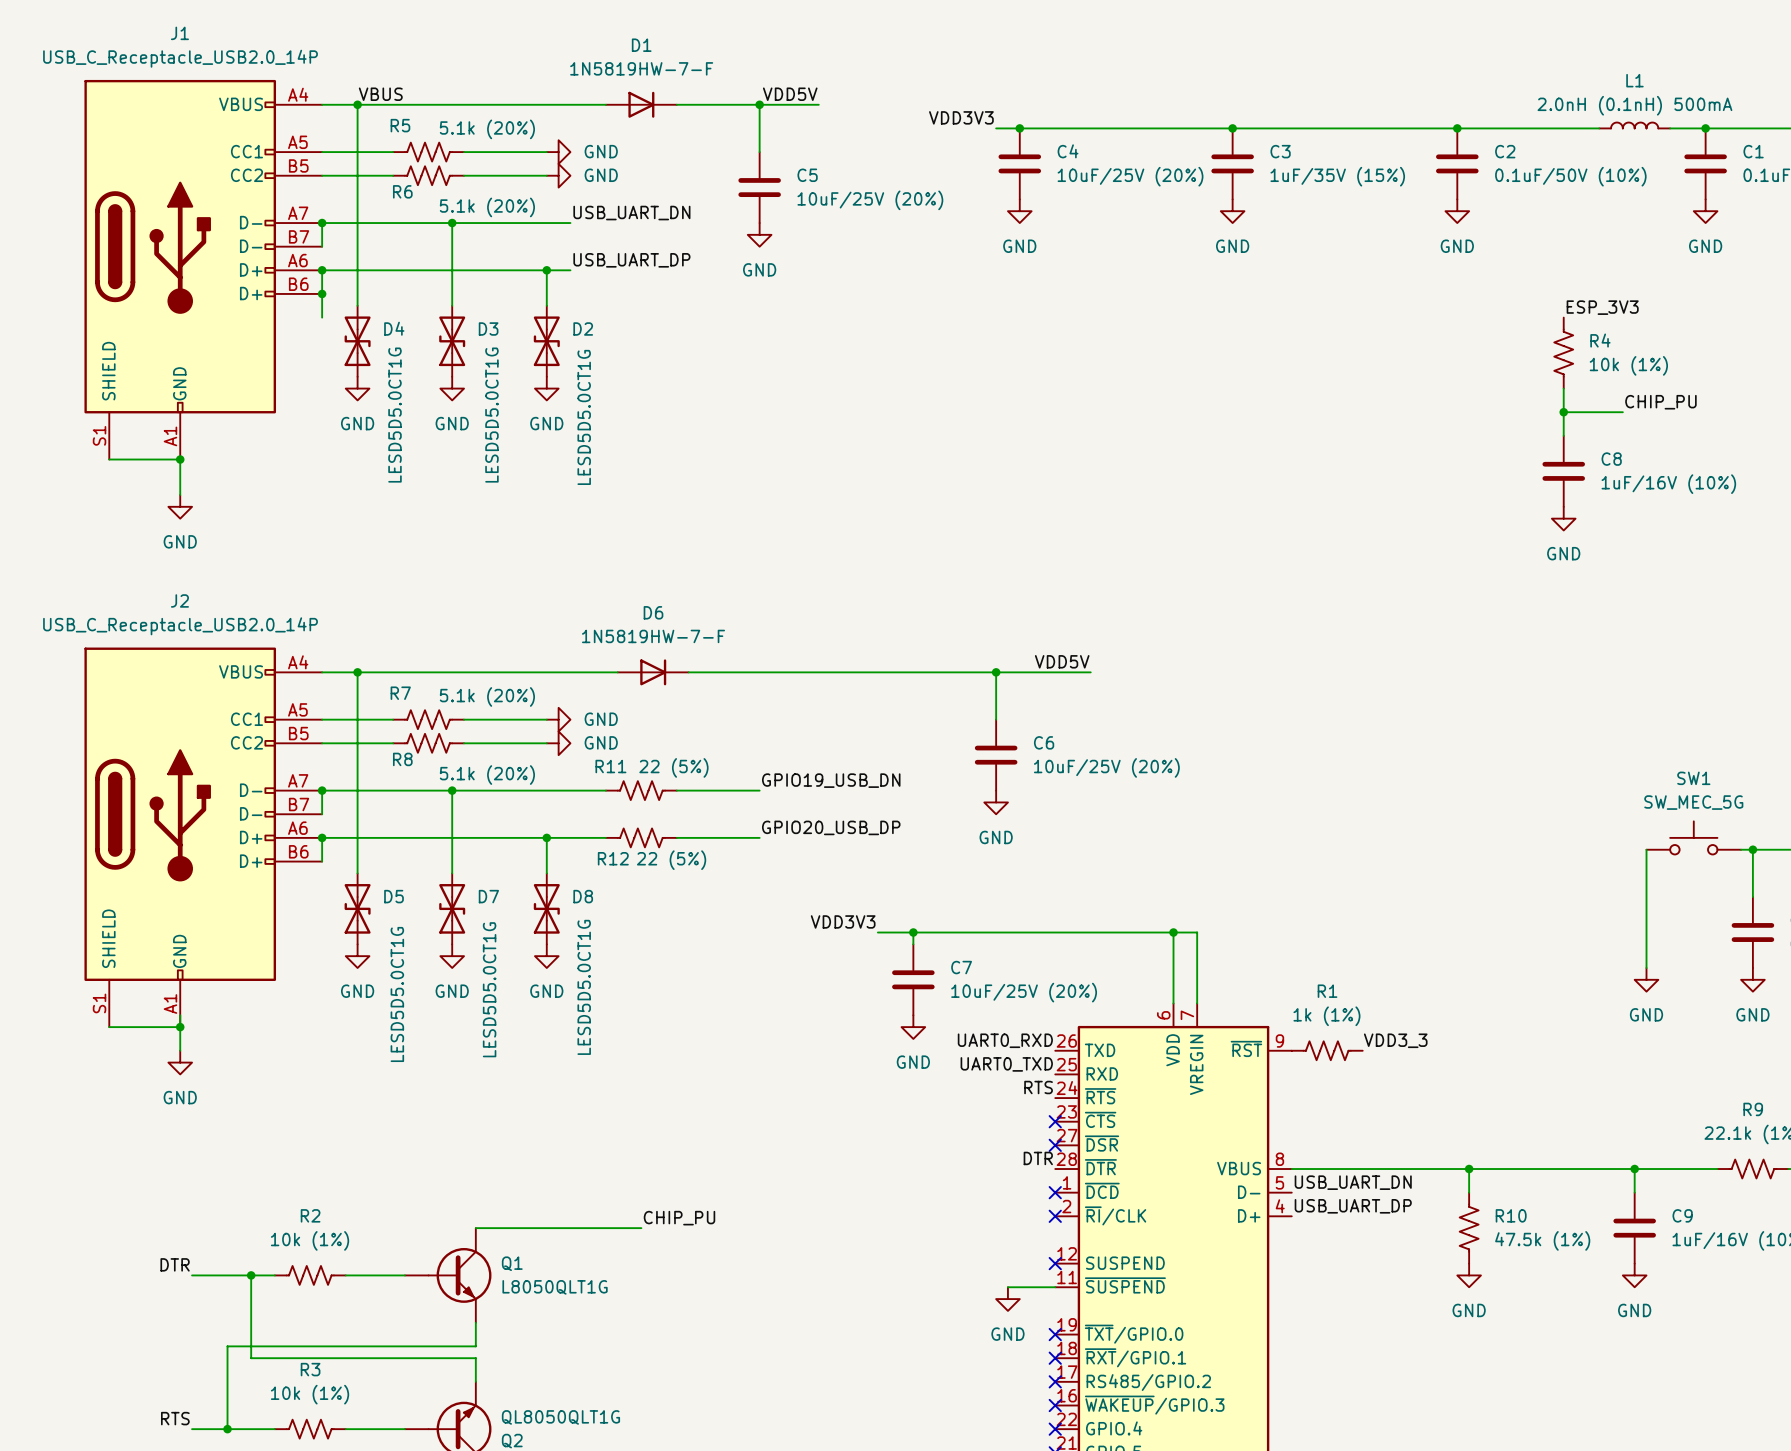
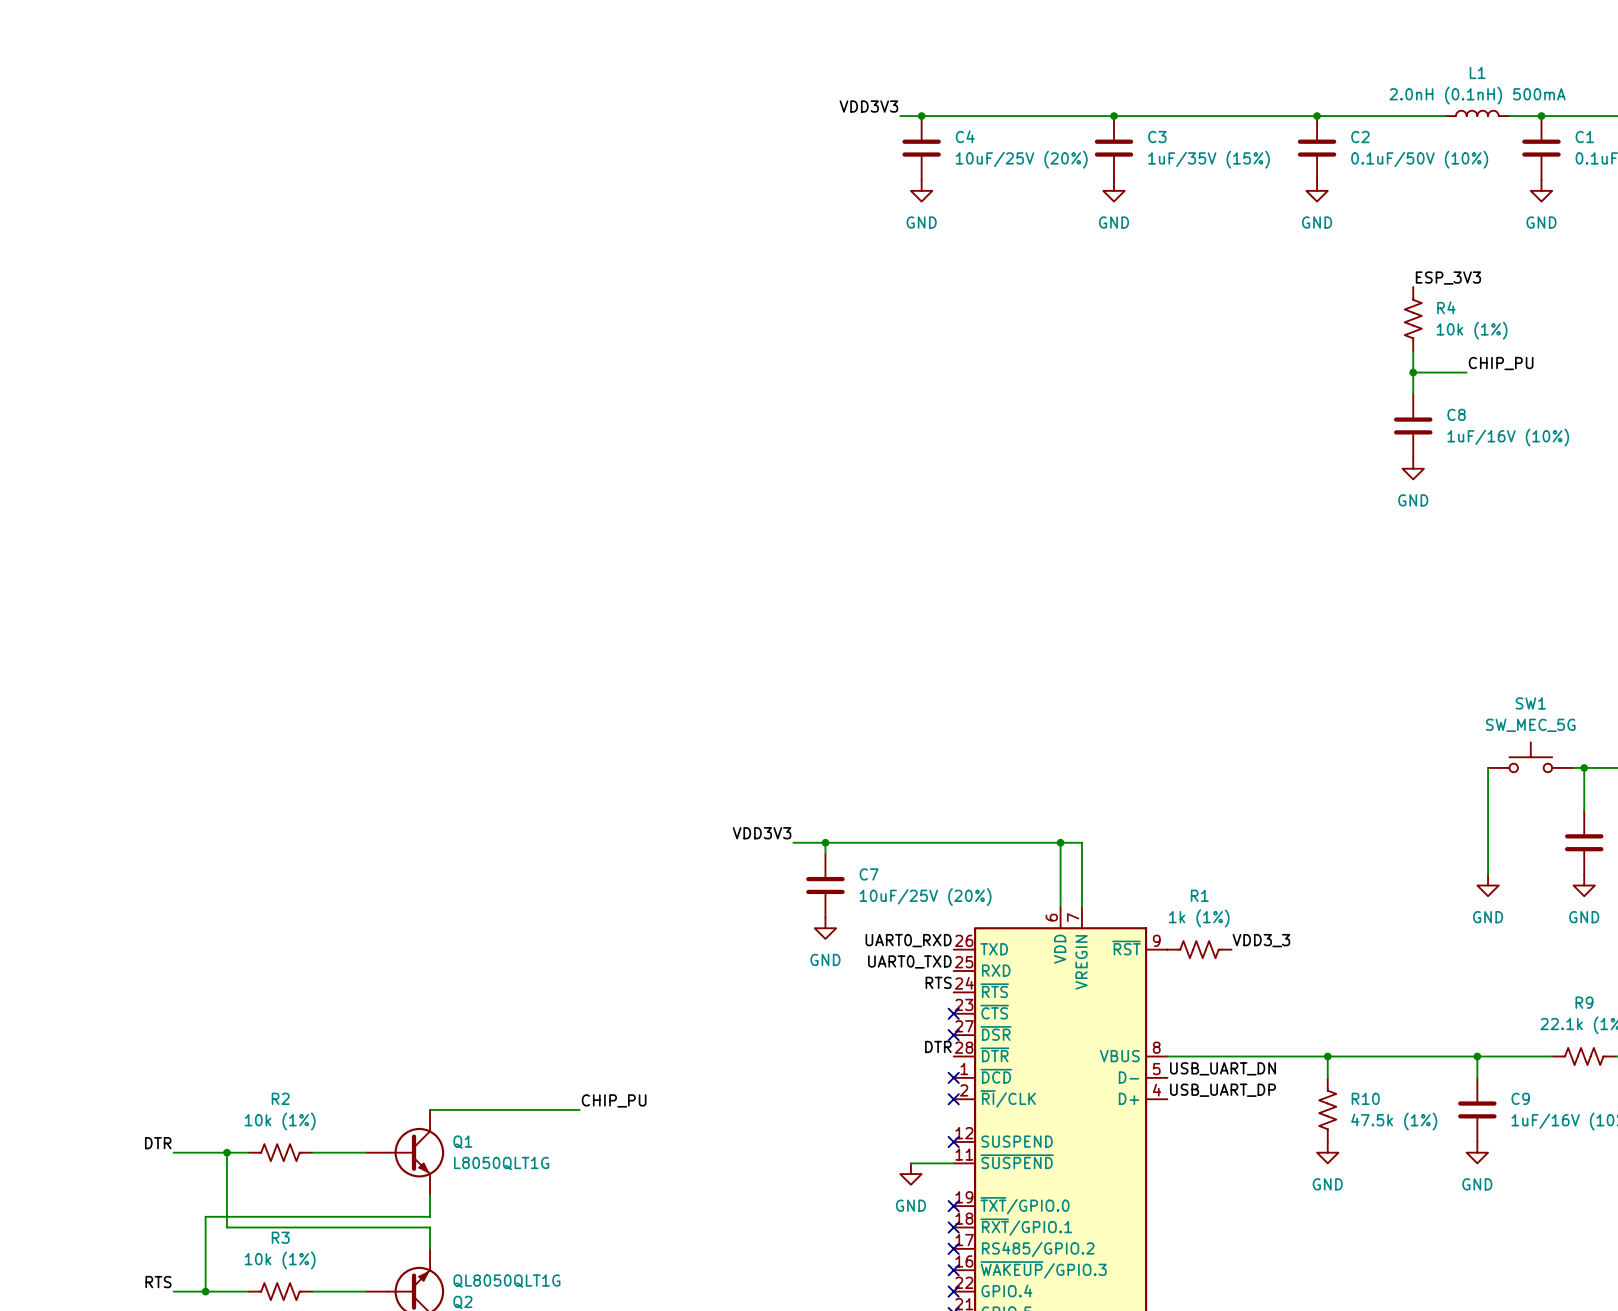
label: VBUS (380, 94) -> none
label: VDD5V (790, 94) -> none
wire: (322, 104) (605, 104) -> none
wire: (357, 104) (357, 305) -> none
junction: (357, 104) -> none
D1: 1N5819HW-7-F (641, 104) -> none
wire: (676, 104) (818, 104) -> none
wire: (759, 104) (759, 152) -> none
junction: (759, 104) -> none
wire: (322, 152) (393, 152) -> none
R5: 5.1k (20%) (428, 152) -> none
wire: (464, 152) (546, 152) -> none
power symbol: GND (558, 152) -> none
wire: (322, 175) (393, 175) -> none
R6: 5.1k (20%) (428, 175) -> none
wire: (464, 175) (546, 175) -> none
power symbol: GND (558, 175) -> none
C5: 10uF/25V (20%) (759, 187) -> none
label: USB_UART_DN (631, 213) -> none
junction: (322, 223) -> none
wire: (452, 223) (452, 305) -> none
junction: (452, 223) -> none
wire: (570, 223) (322, 223) (322, 246) -> none
power symbol: GND (759, 234) -> none
label: USB_UART_DP (631, 260) -> none
J1: USB_C_Receptacle_USB2.0_14P (203, 269) -> none
junction: (322, 270) -> none
wire: (546, 270) (546, 305) -> none
junction: (546, 270) -> none
wire: (570, 270) (322, 270) (322, 317) -> none
junction: (322, 293) -> none
D4: LESD5D5.0CT1G (357, 341) -> none
D3: LESD5D5.0CT1G (452, 341) -> none
D2: LESD5D5.0CT1G (546, 341) -> none
power symbol: GND (357, 388) -> none
power symbol: GND (452, 388) -> none
power symbol: GND (546, 388) -> none
wire: (109, 459) (180, 459) (180, 494) -> none
junction: (180, 459) -> none
power symbol: GND (180, 506) -> none
label: VDD5V (1062, 661) -> none
wire: (322, 672) (617, 672) -> none
wire: (357, 672) (357, 873) -> none
junction: (357, 672) -> none
D6: 1N5819HW-7-F (653, 672) -> none
wire: (688, 672) (1090, 672) -> none
wire: (996, 672) (996, 719) -> none
junction: (996, 672) -> none
wire: (322, 719) (393, 719) -> none
R7: 5.1k (20%) (428, 719) -> none
wire: (464, 719) (546, 719) -> none
power symbol: GND (558, 719) -> none
wire: (322, 743) (393, 743) -> none
R8: 5.1k (20%) (428, 743) -> none
wire: (464, 743) (546, 743) -> none
power symbol: GND (558, 743) -> none
C6: 10uF/25V (20%) (996, 755) -> none
label: GPIO19_USB_DN (831, 780) -> none
junction: (322, 790) -> none
wire: (452, 790) (452, 873) -> none
junction: (452, 790) -> none
wire: (605, 790) (322, 790) (322, 814) -> none
R11: 22 (5%) (641, 790) -> none
wire: (676, 790) (759, 790) -> none
power symbol: GND (996, 802) -> none
label: GPIO20_USB_DP (831, 827) -> none
J2: USB_C_Receptacle_USB2.0_14P (203, 837) -> none
junction: (322, 837) -> none
wire: (546, 837) (546, 873) -> none
junction: (546, 837) -> none
wire: (605, 837) (322, 837) (322, 861) -> none
R12: 22 (5%) (641, 837) -> none
wire: (676, 837) (759, 837) -> none
D5: LESD5D5.0CT1G (357, 908) -> none
D7: LESD5D5.0CT1G (452, 908) -> none
D8: LESD5D5.0CT1G (546, 908) -> none
power symbol: GND (357, 956) -> none
power symbol: GND (452, 956) -> none
power symbol: GND (546, 956) -> none
wire: (180, 1015) (180, 1050) -> none
wire: (109, 1027) (180, 1027) -> none
junction: (180, 1027) -> none
power symbol: GND (180, 1062) -> none

